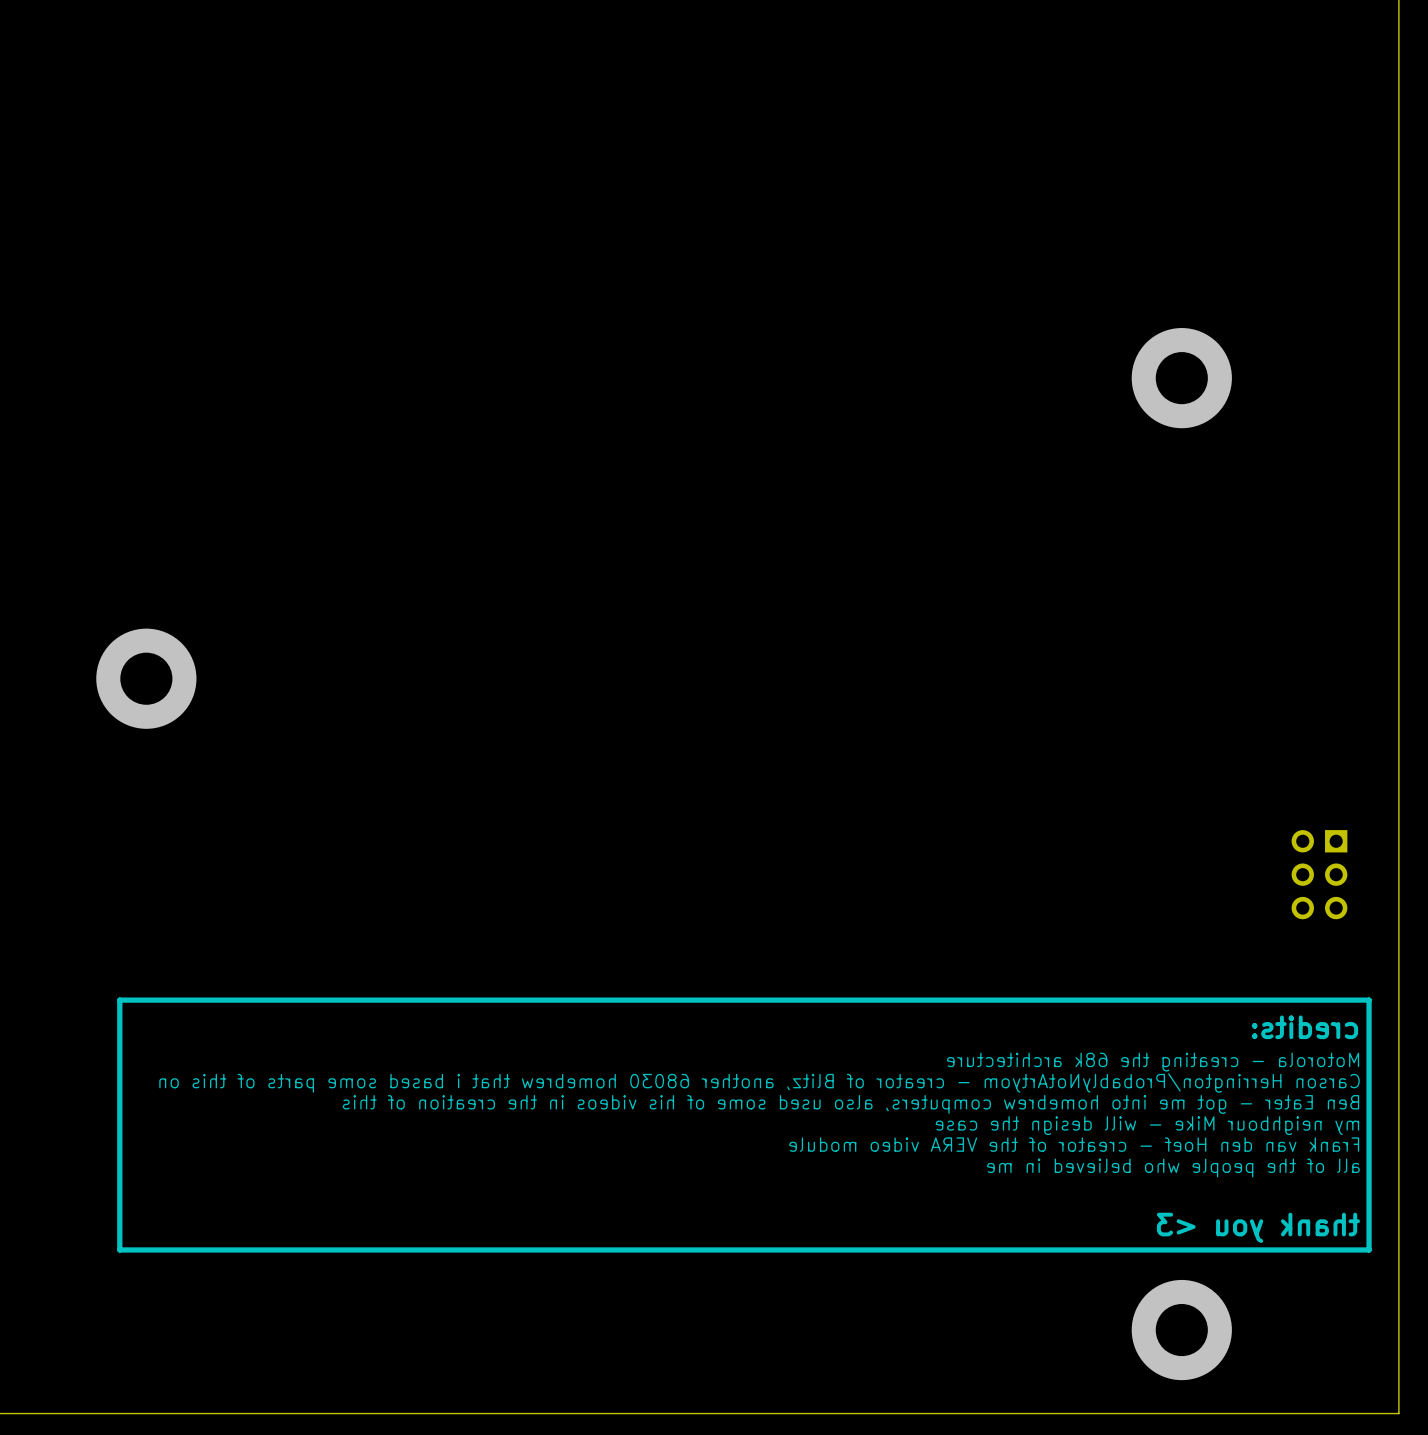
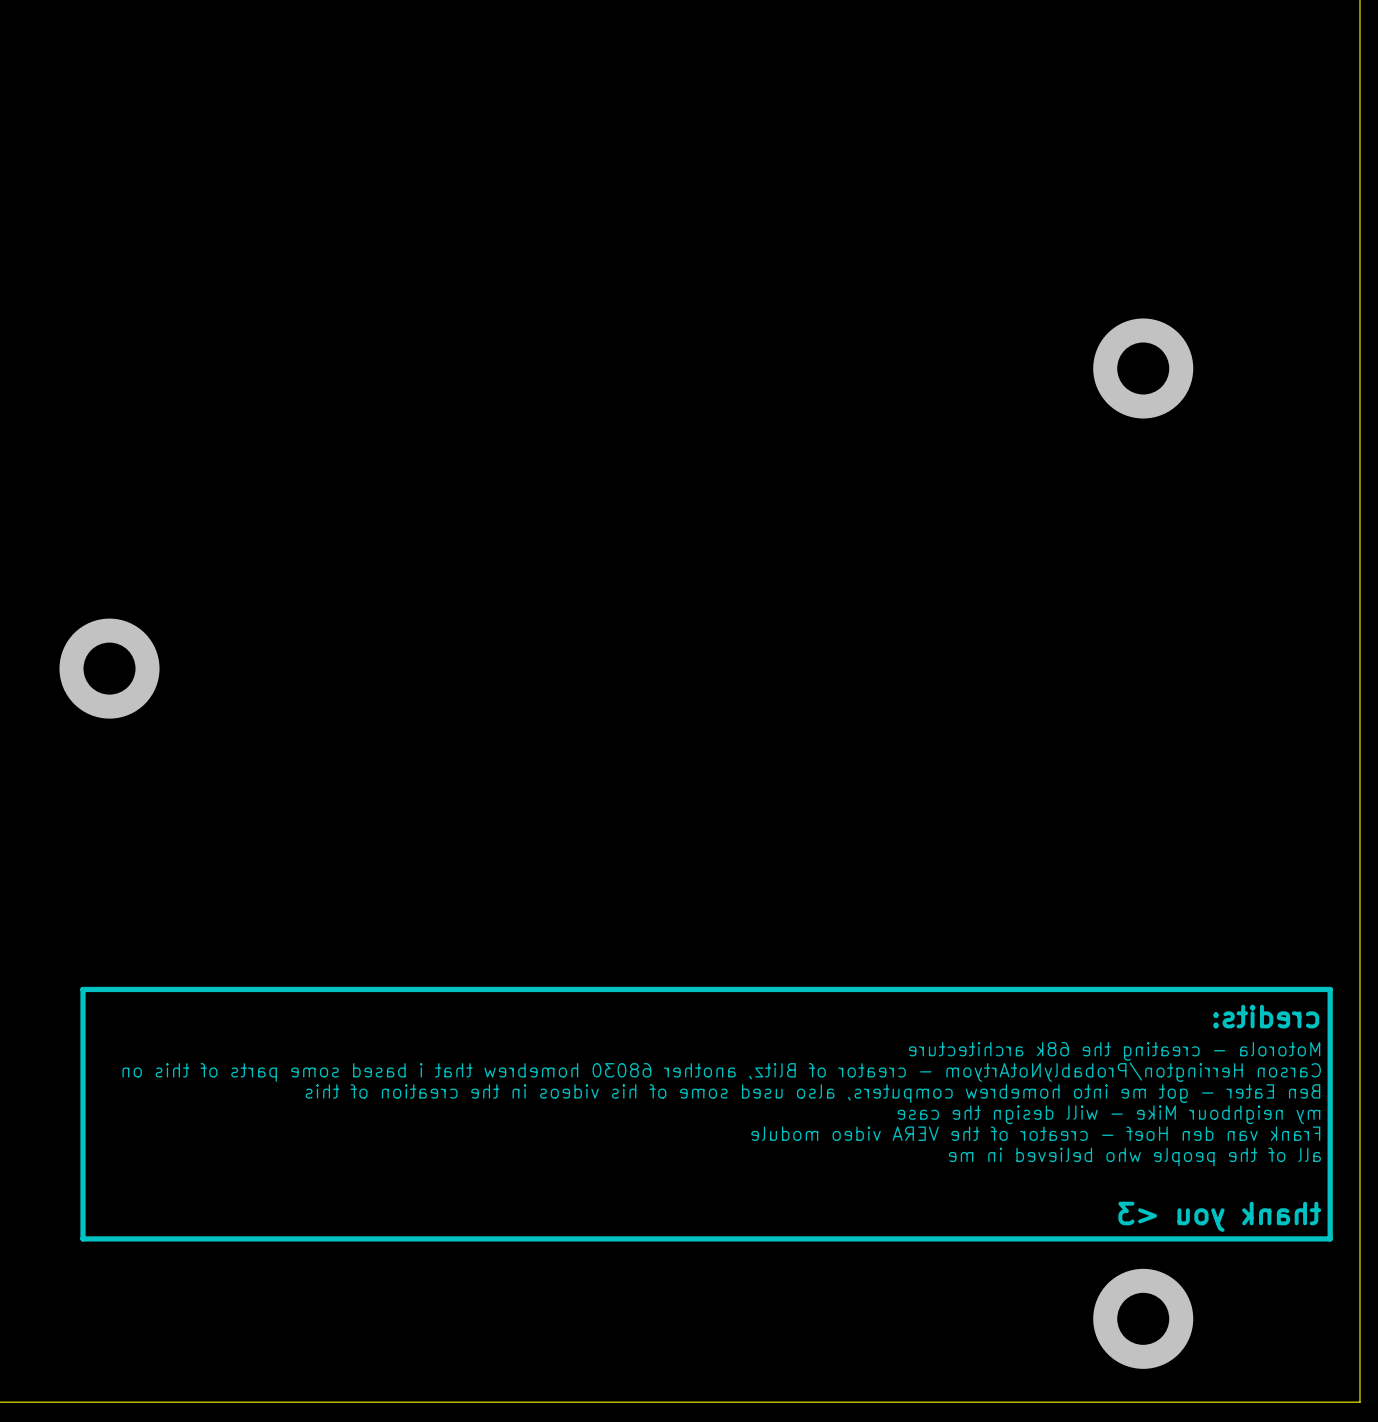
part: (1319, 874) -> none

